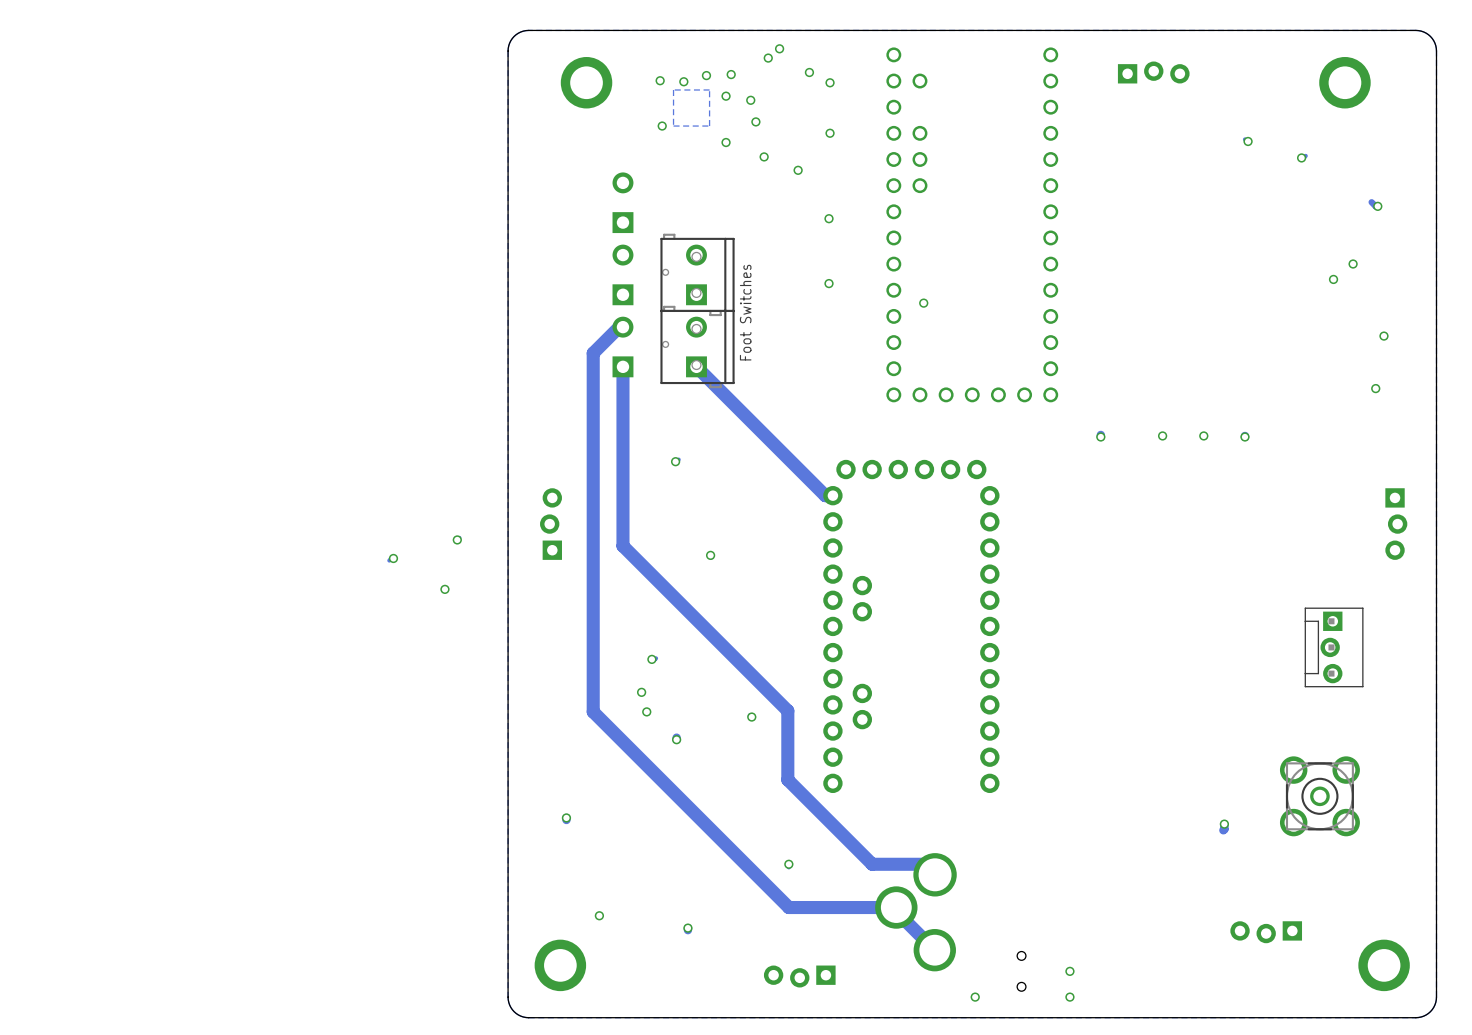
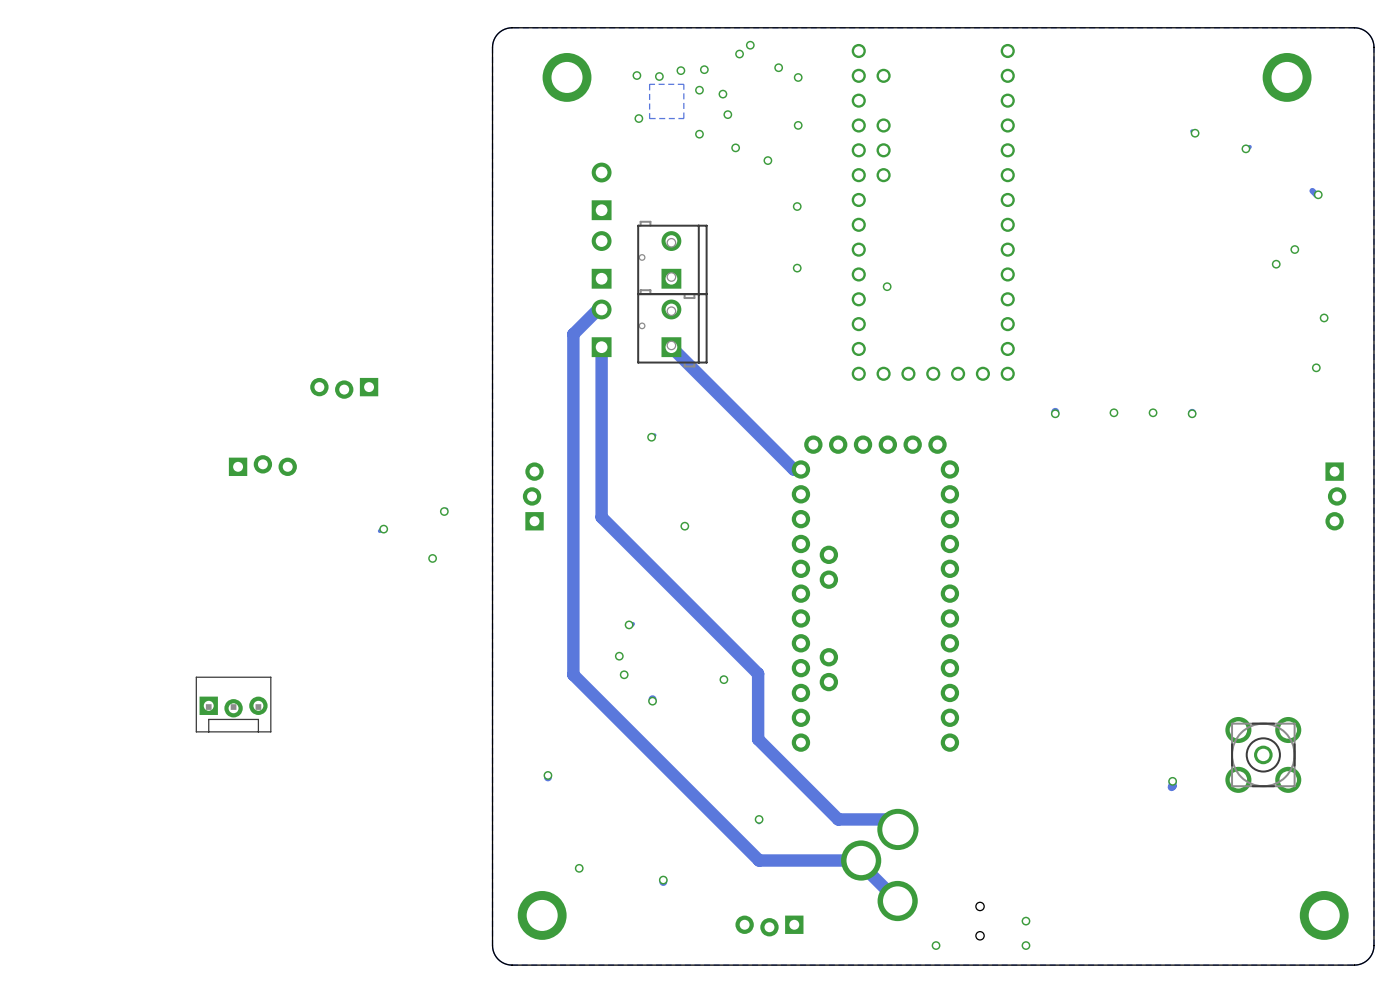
part: (1153, 72) -> none
text: Foot Switches (745, 312) -> none
part: none -> (344, 388)
part: none -> (262, 465)
part: (1334, 647) -> none
part: none -> (233, 704)
part: (1266, 932) -> none

